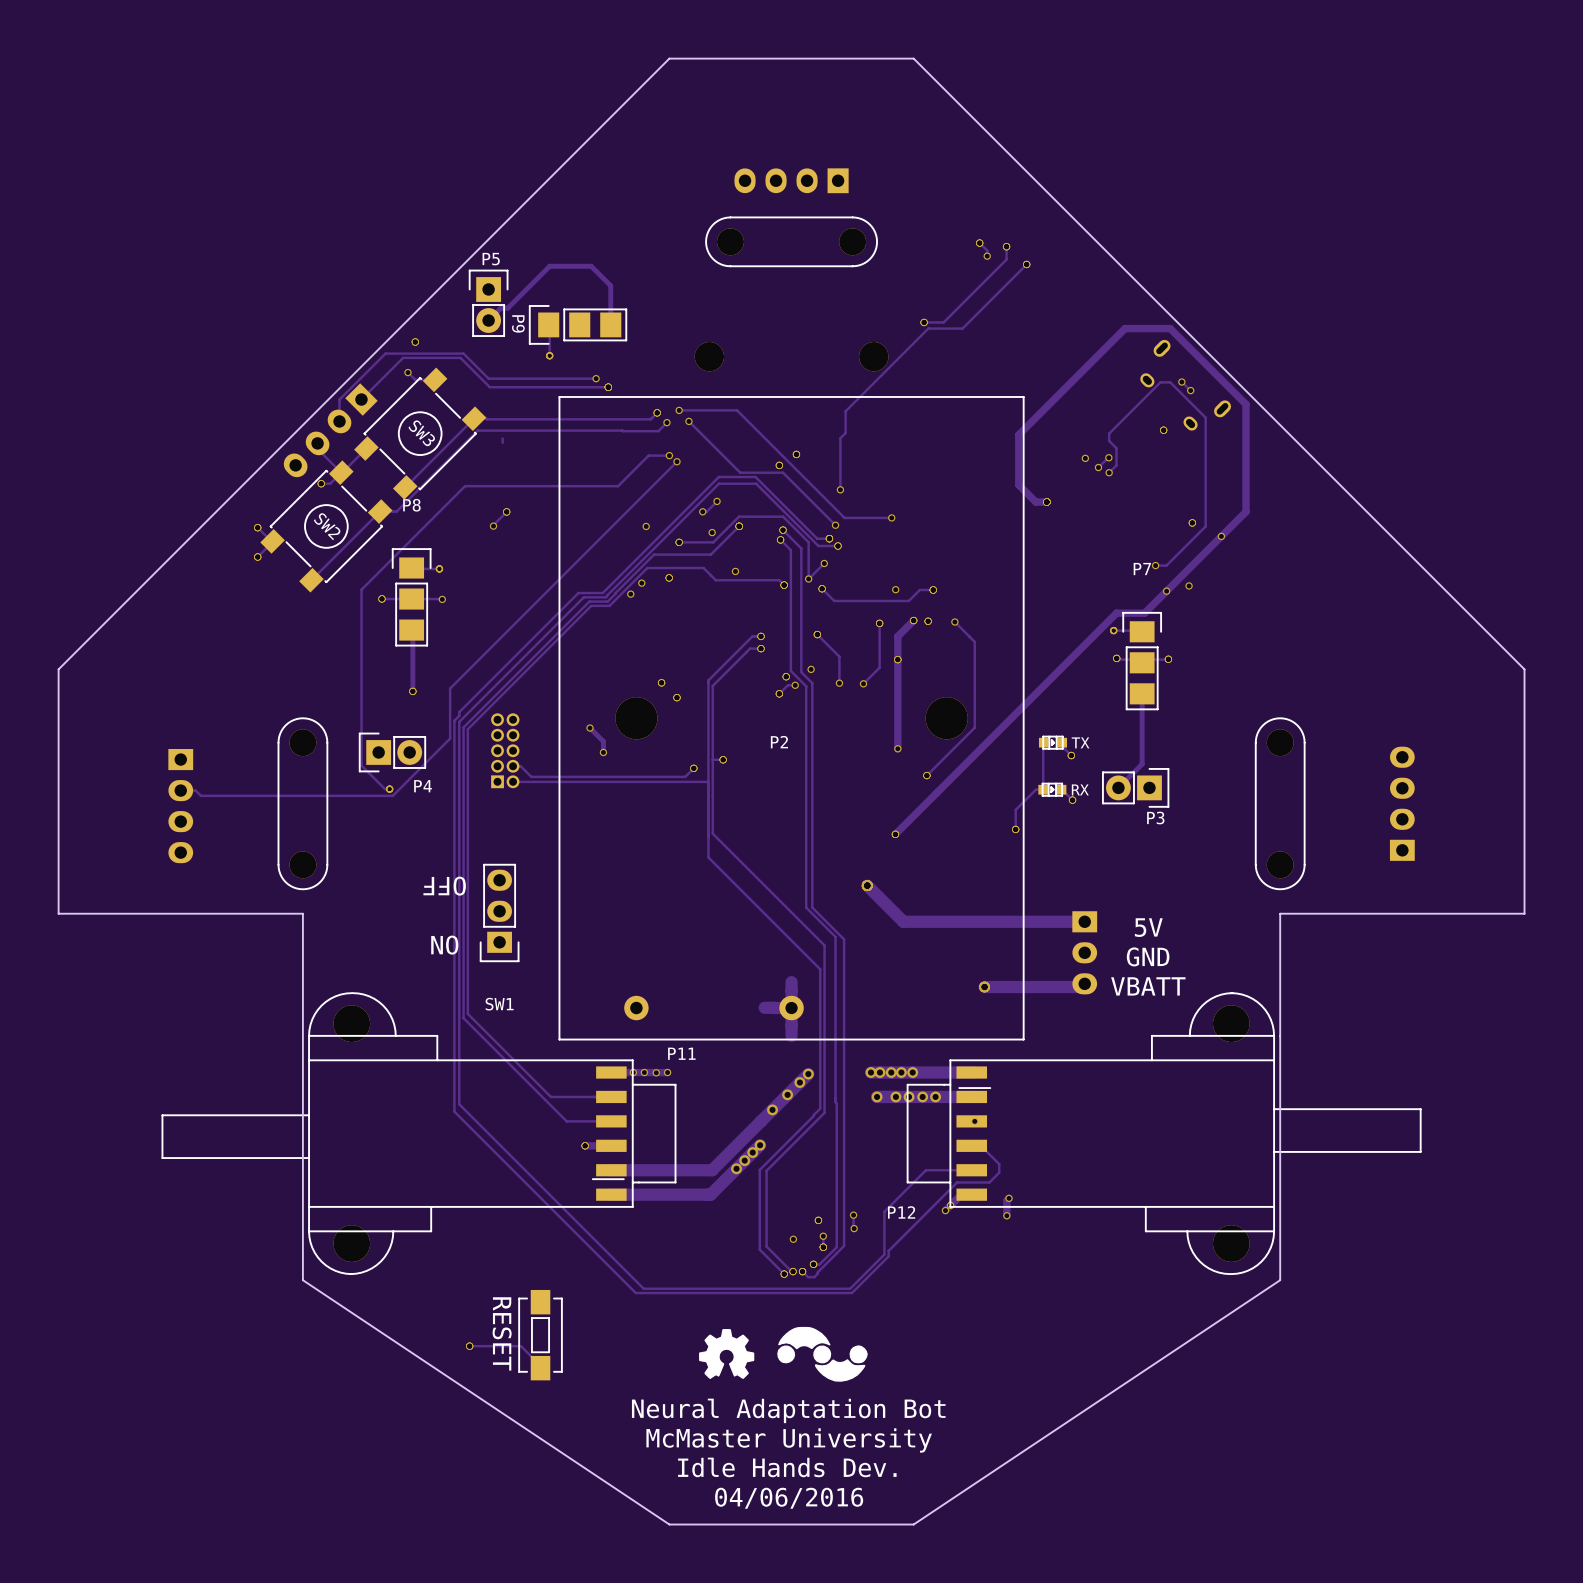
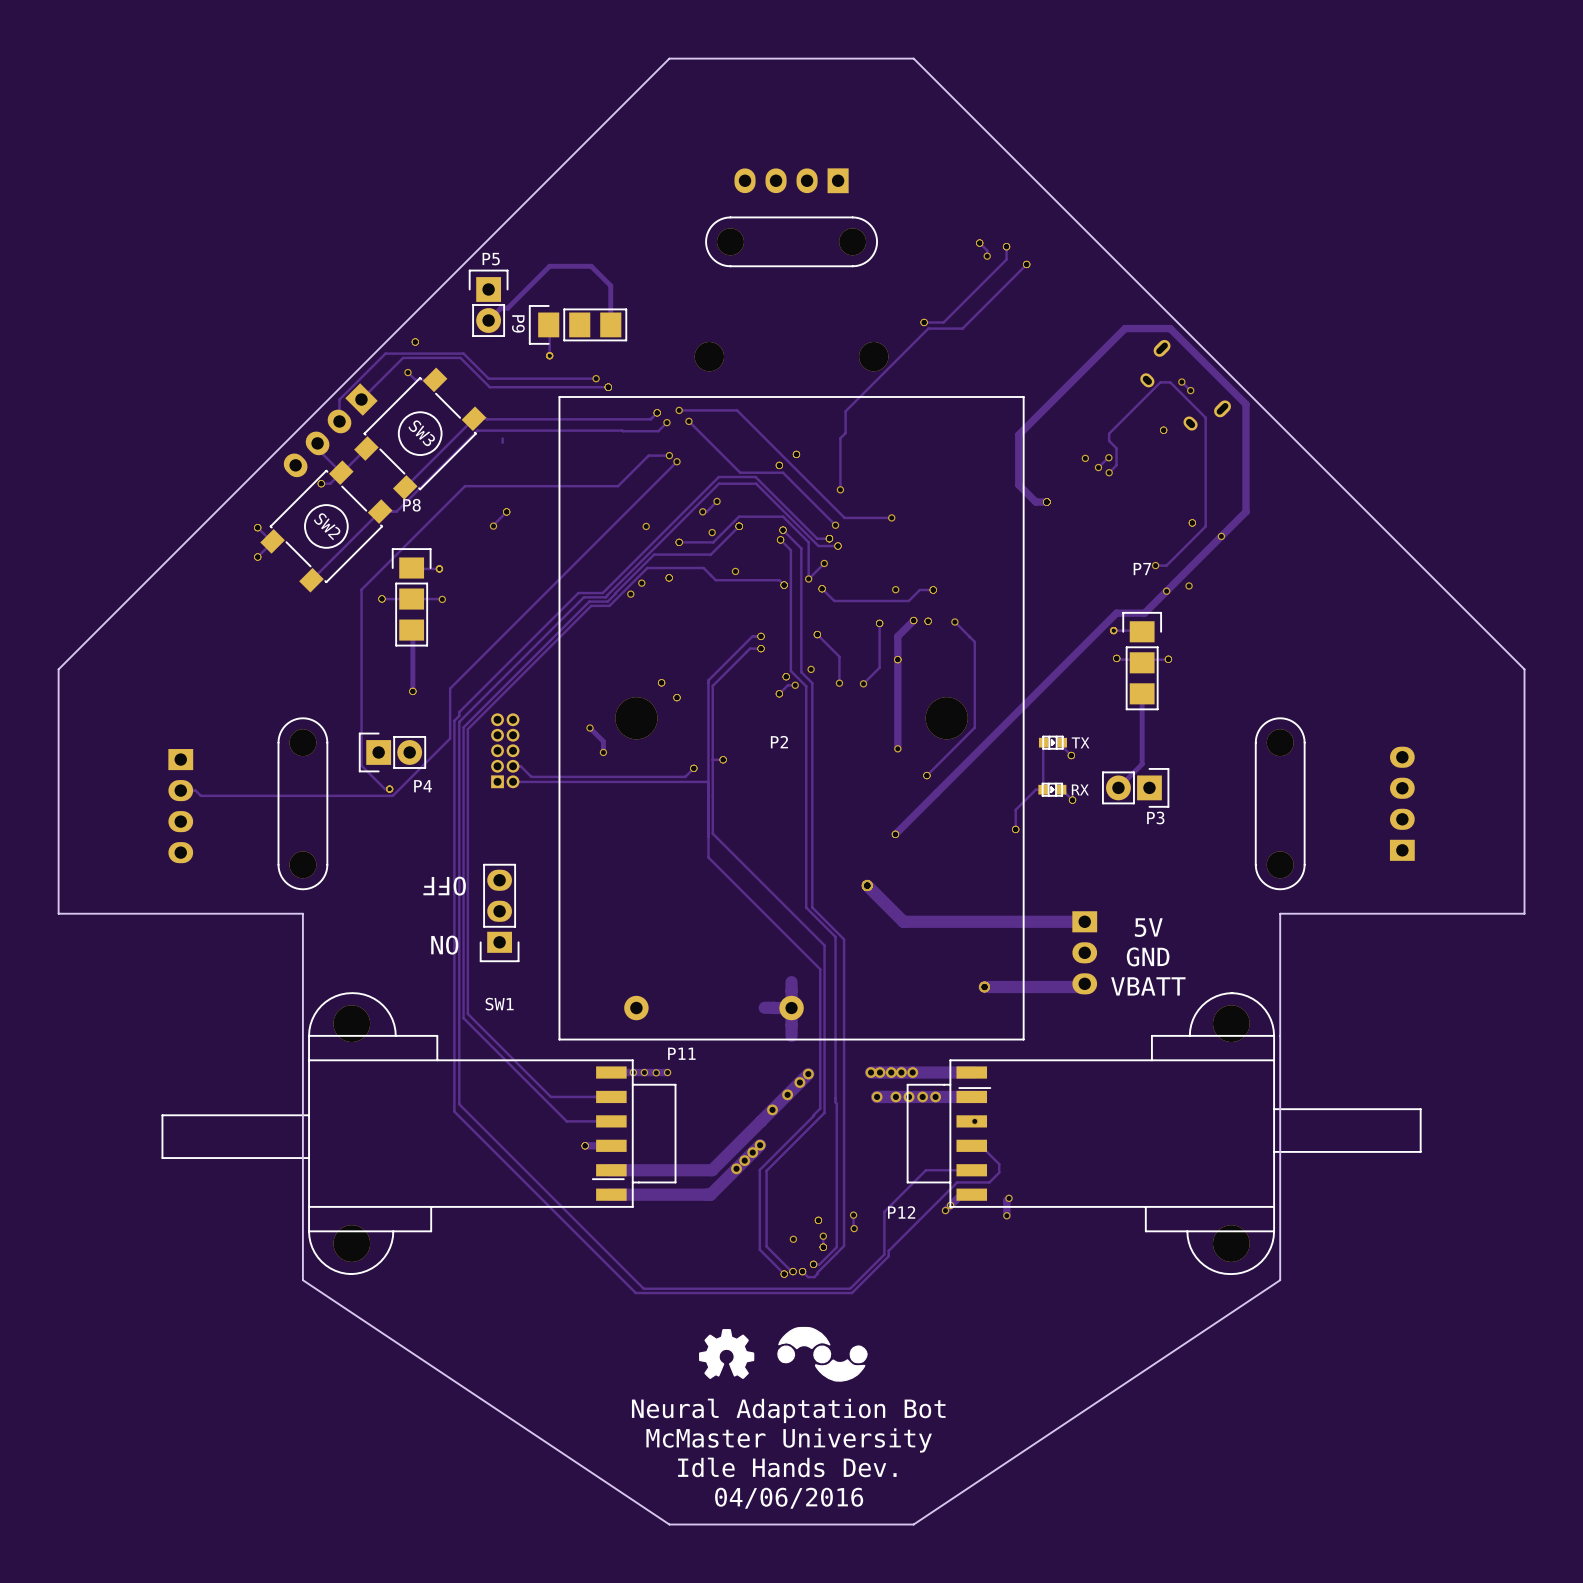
RESET: (540, 1335) -> none
track: (469, 1346) (520, 1346) (540, 1365) (540, 1368) -> none
via: (469, 1346) -> none

